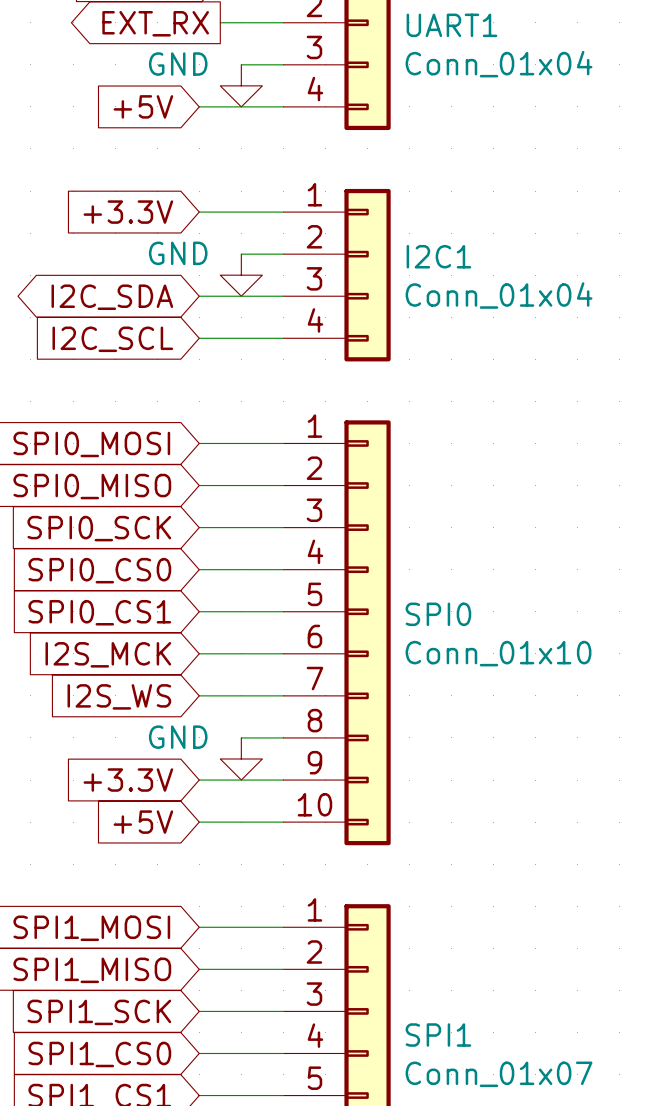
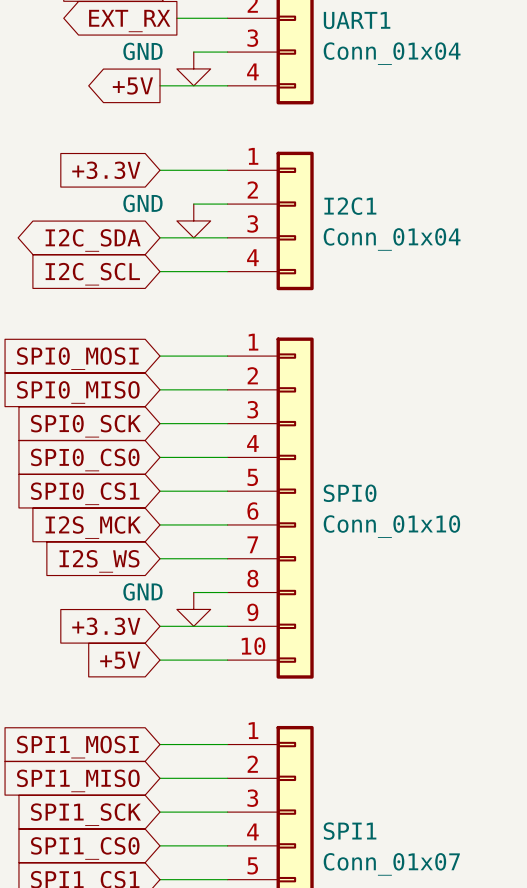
global label shape: input (143, 106) -> output (132, 86)

